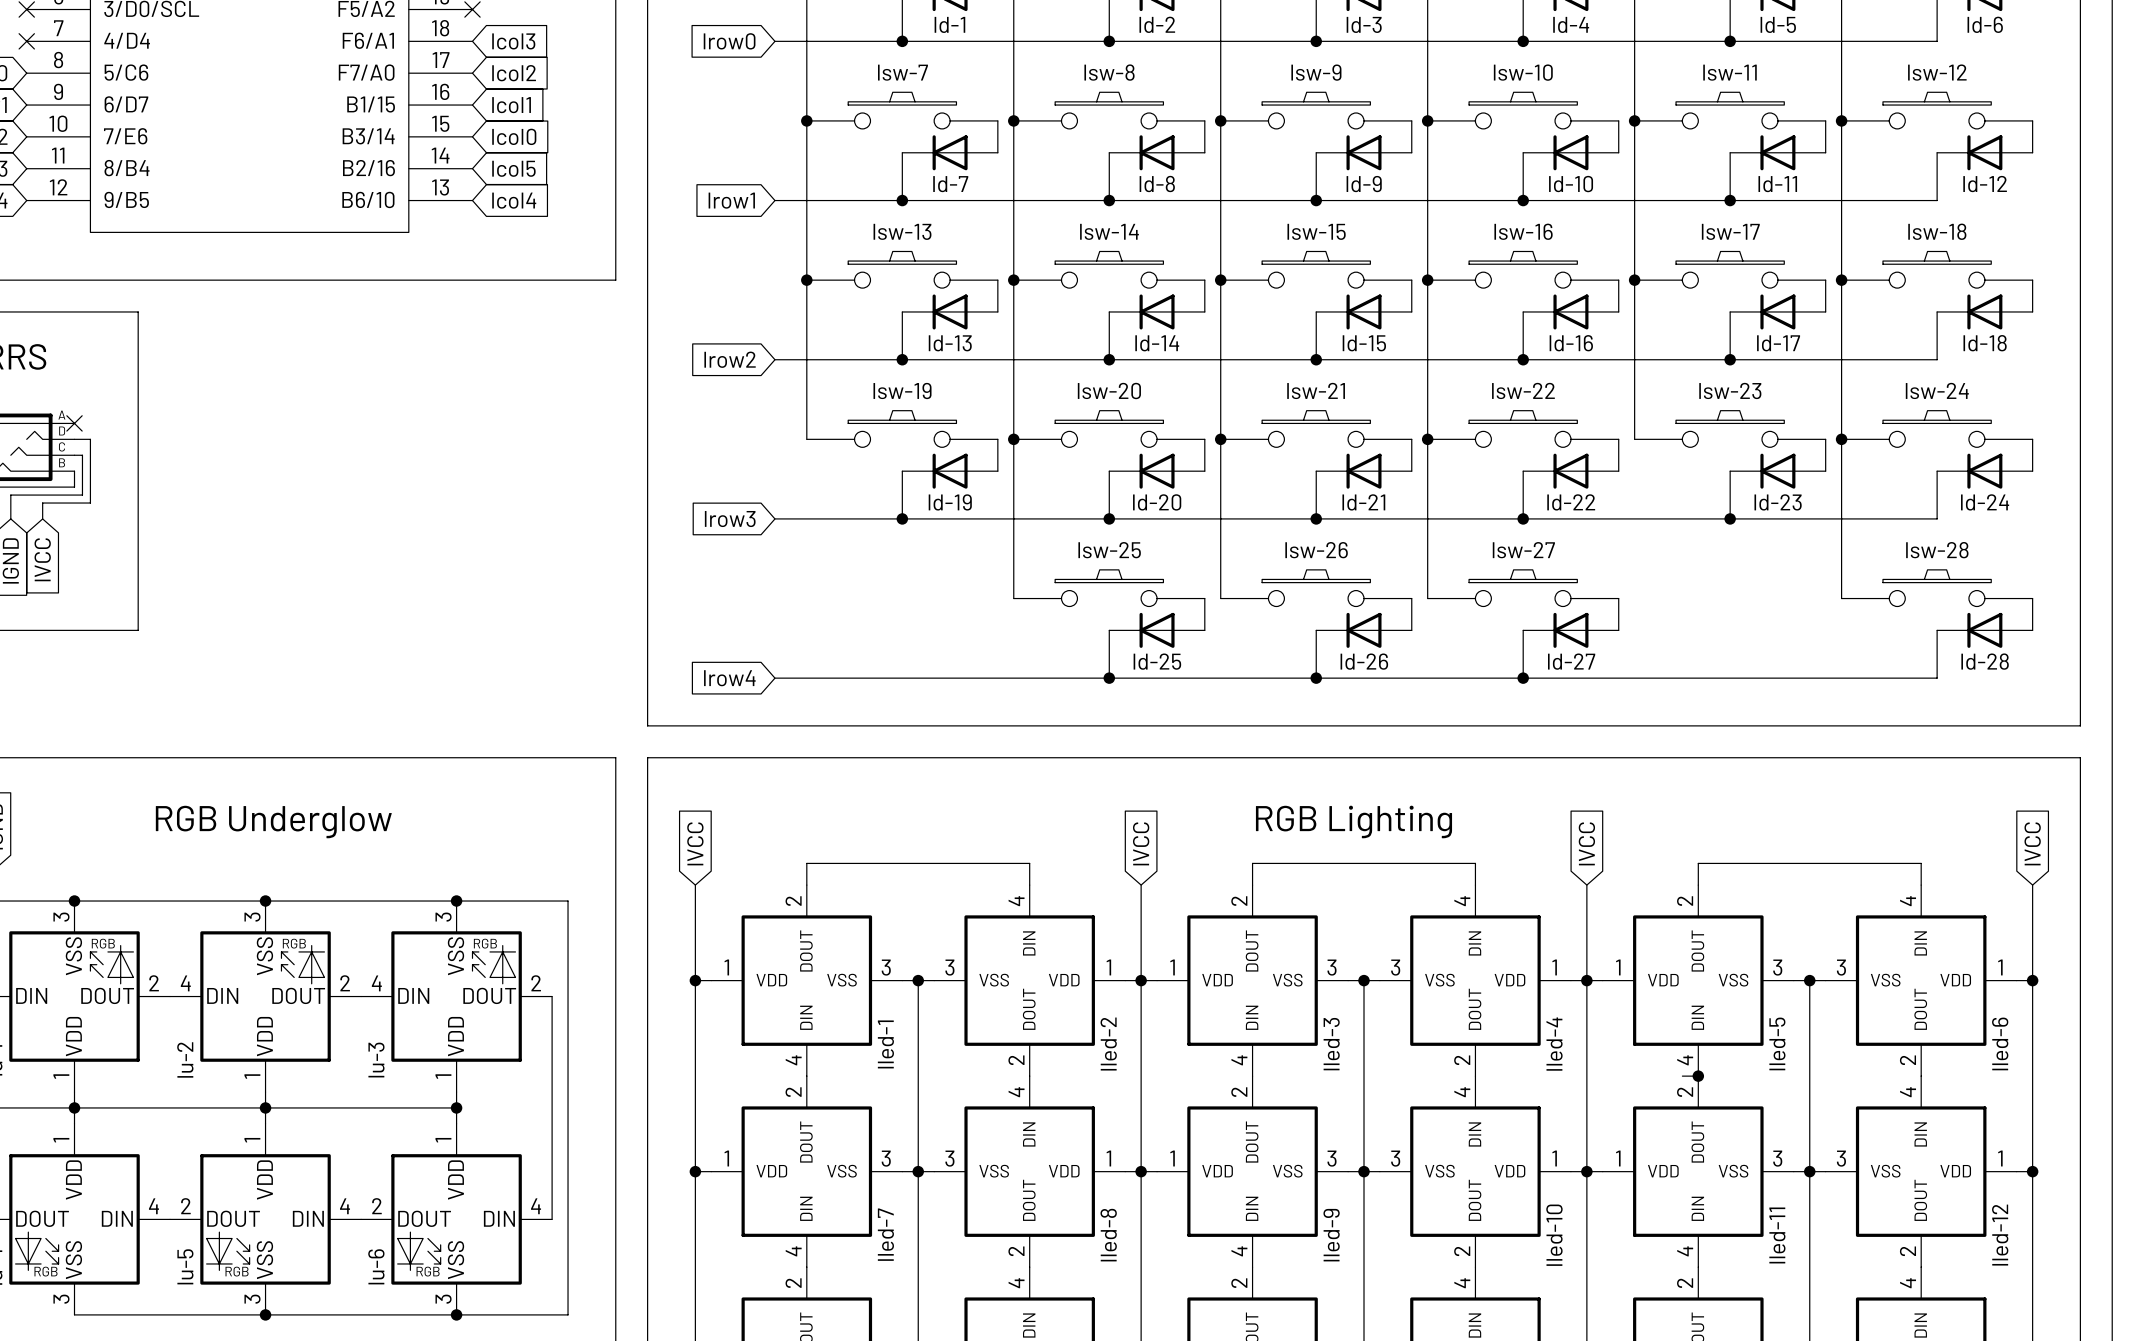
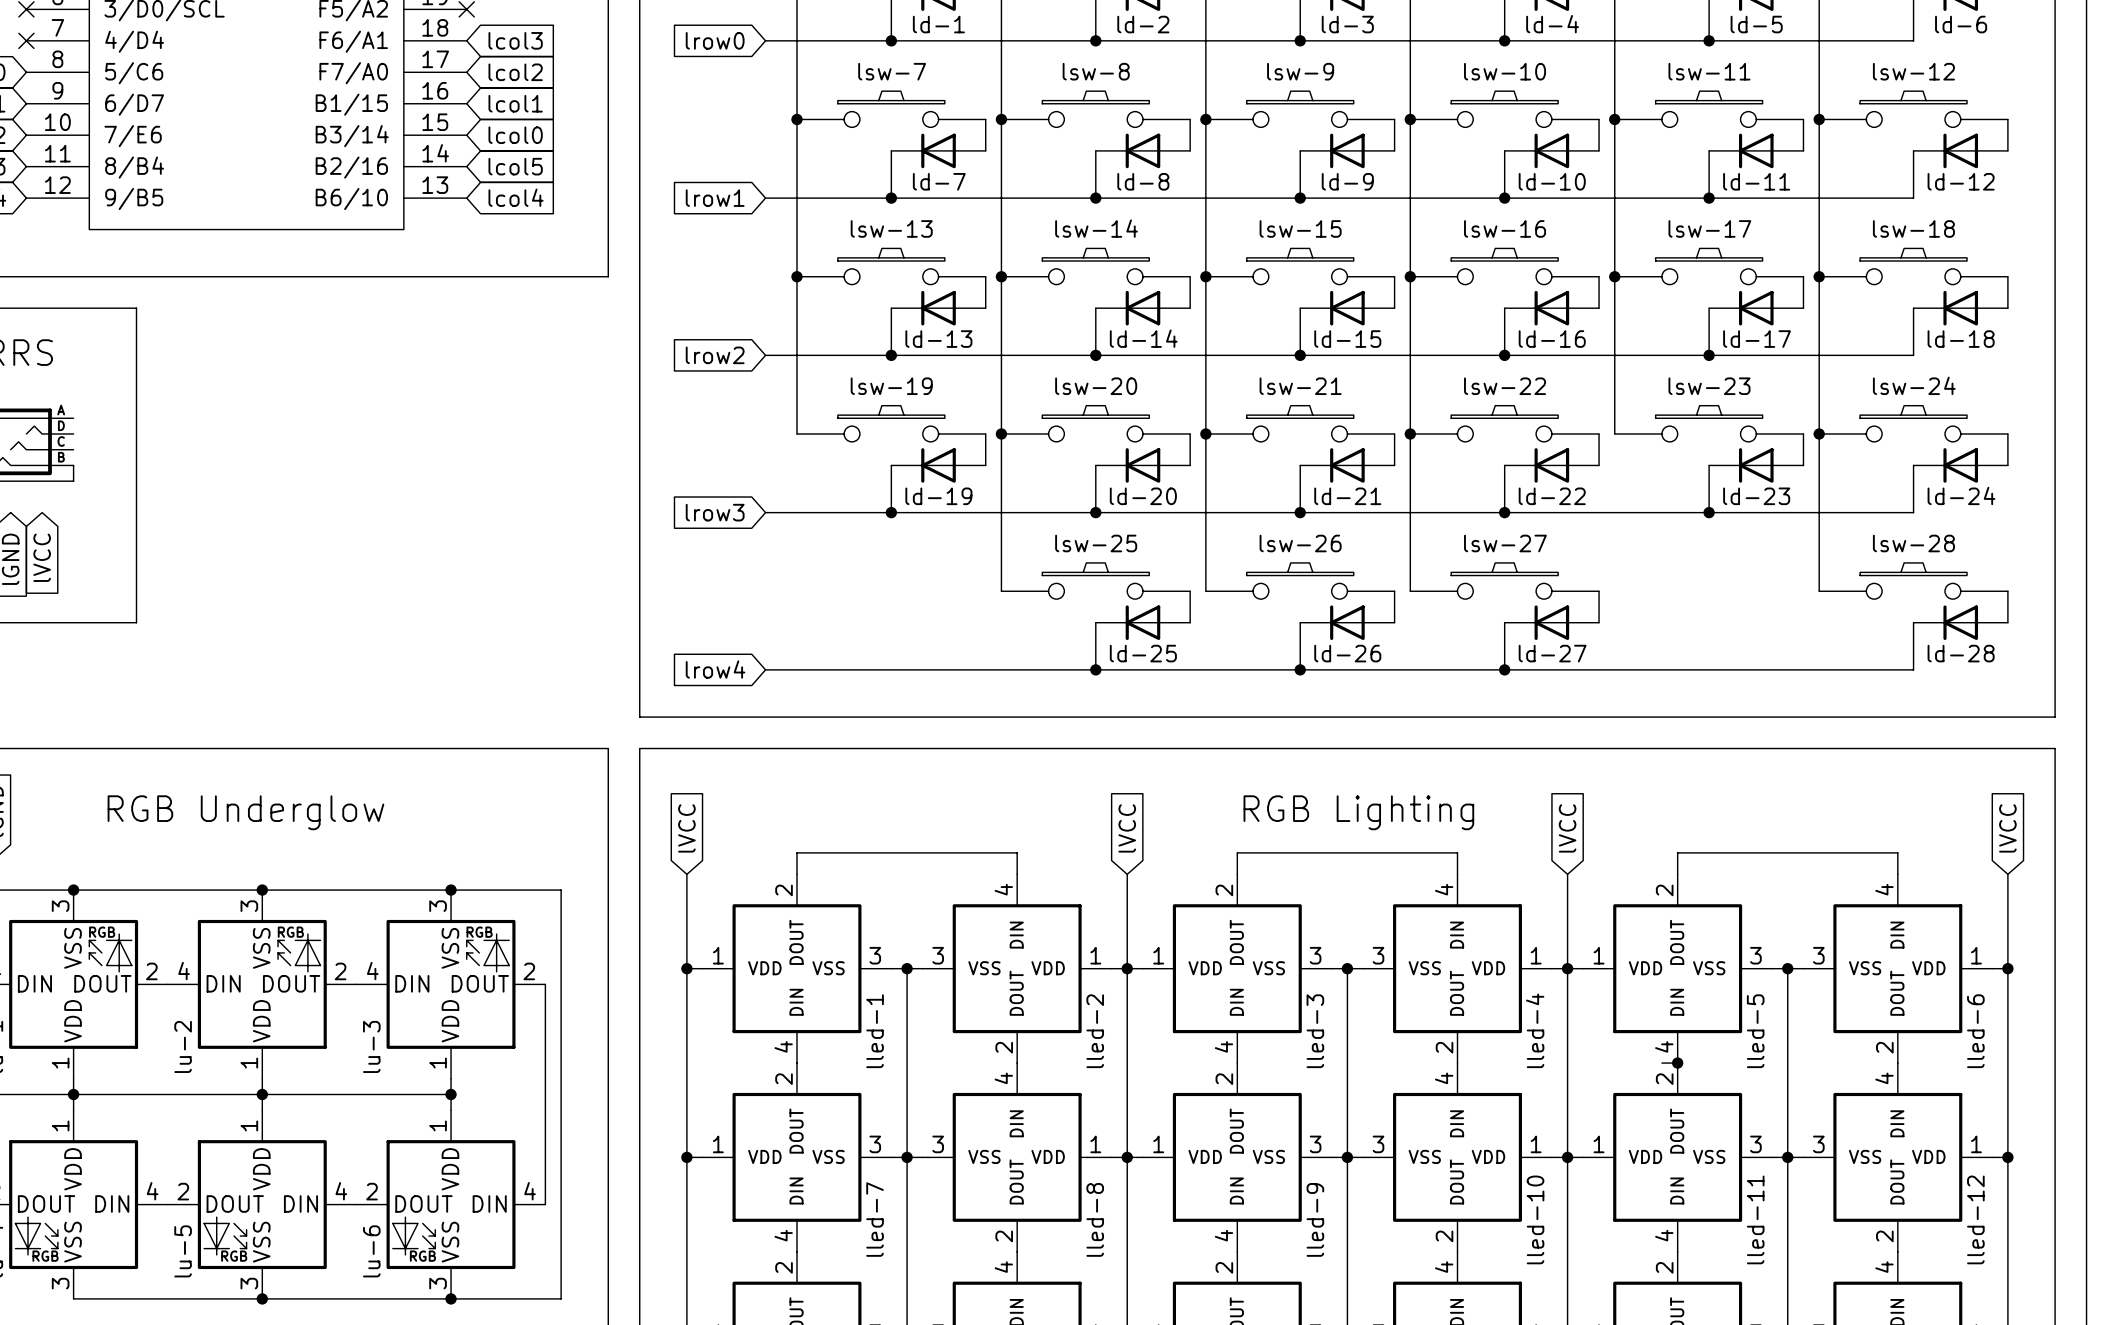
no-connect mark: (74, 423) -> none
wire: (74, 439) (90, 439) (90, 503) (42, 503) (42, 518) -> none
wire: (74, 455) (82, 455) (82, 495) (10, 495) (10, 518) -> none

